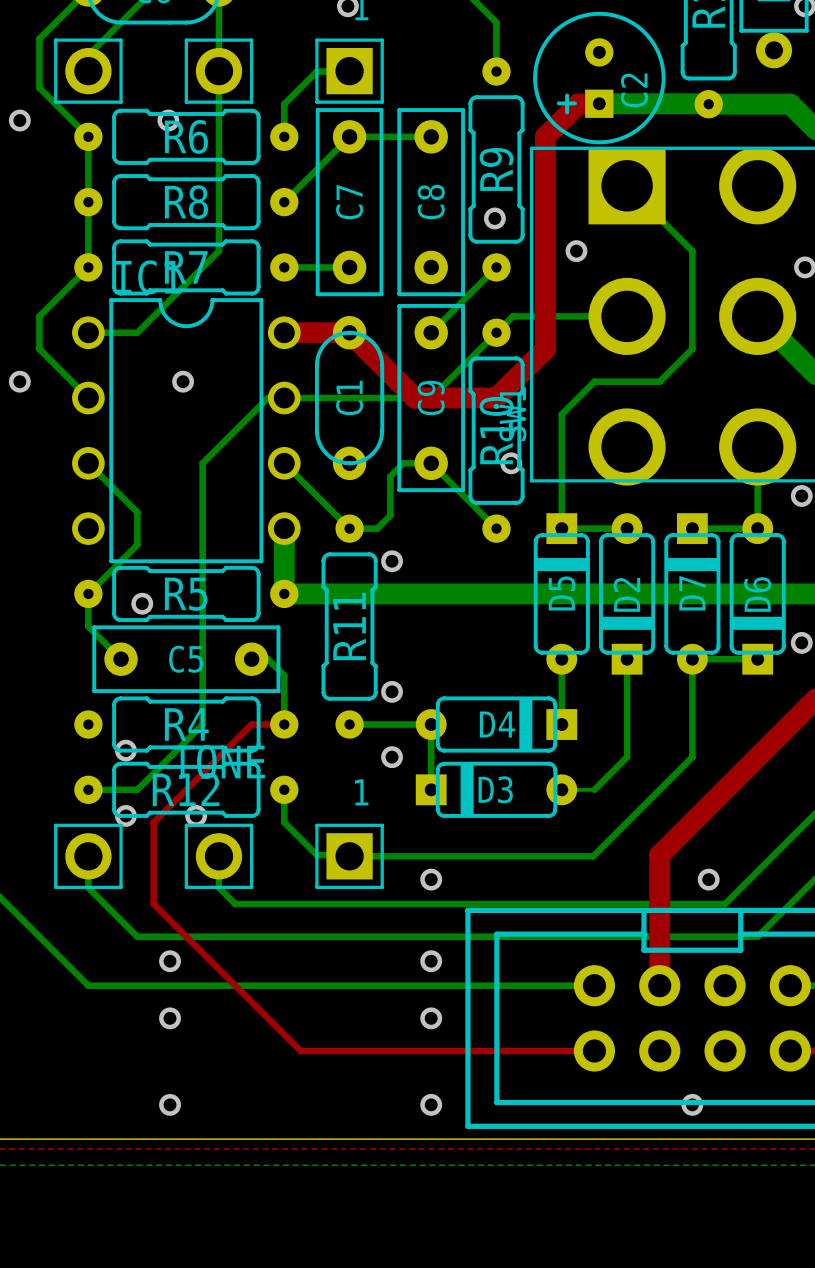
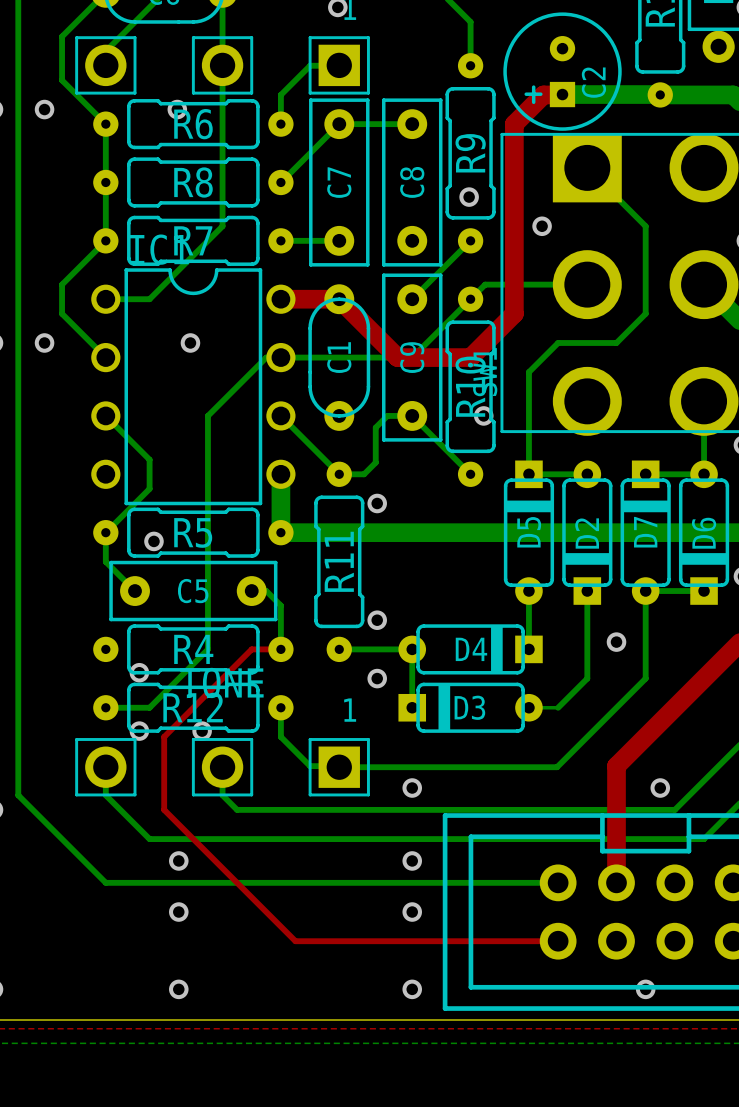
via: none -> (616, 642)

